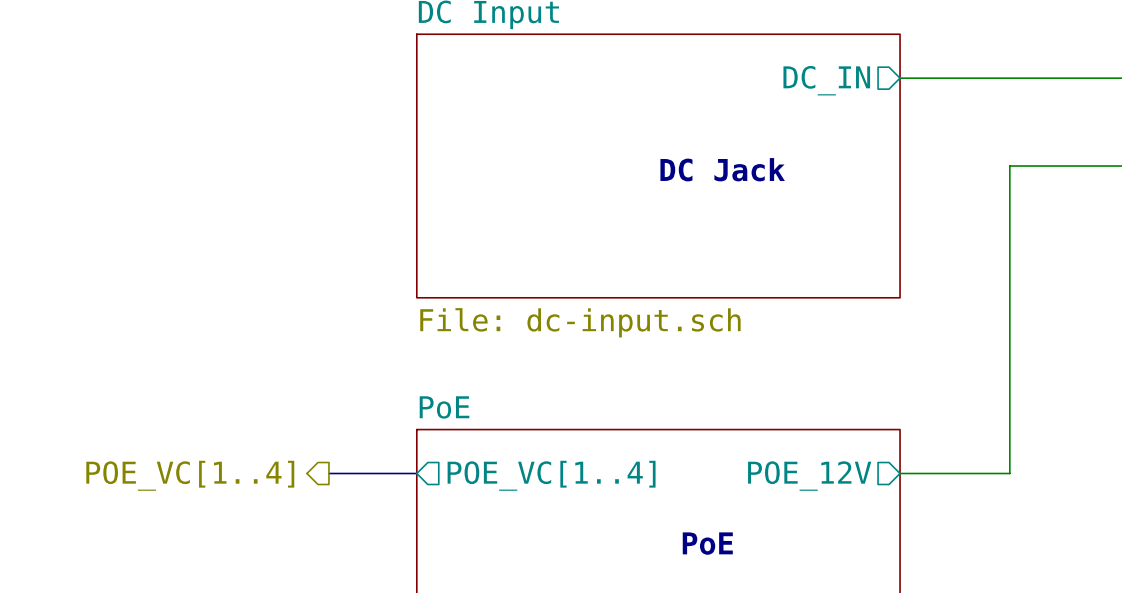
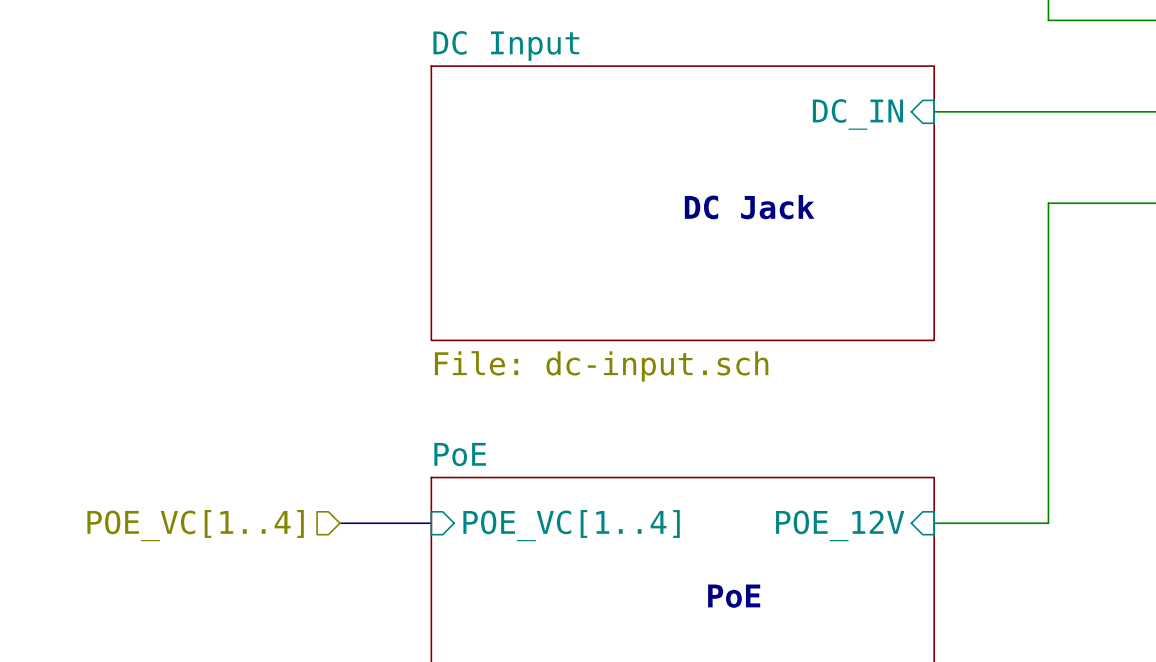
sheet pin shape: output (826, 80) -> input (857, 114)
hierarchical label shape: output (190, 475) -> input (195, 525)
sheet pin shape: output (551, 475) -> input (571, 525)
sheet pin shape: output (809, 476) -> input (840, 525)

